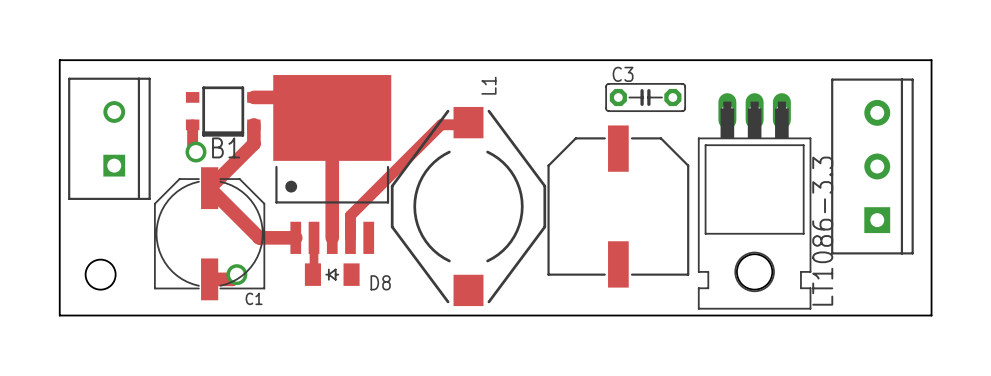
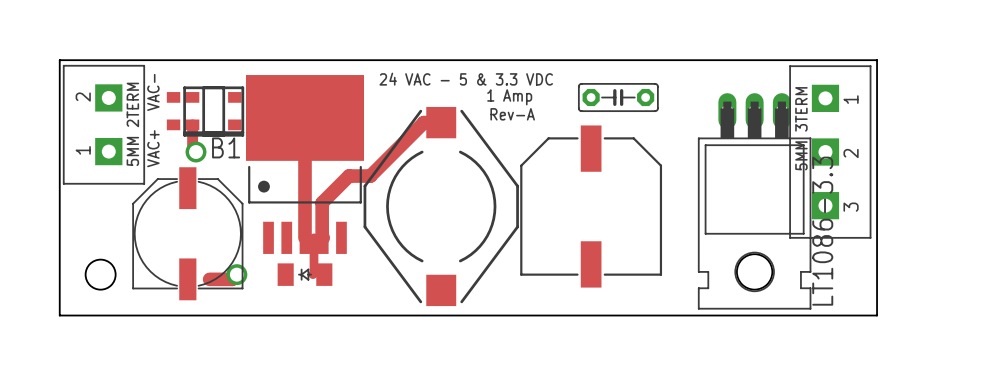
board edge: (877, 60) (931, 60) (931, 315) (877, 315) -> (877, 60) (877, 315)
text: none -> 24 VAC - 5 & 3.3 VDC (466, 79)
text: none -> VAC- (153, 92)
text: none -> 1 Amp (509, 97)
part: none -> (618, 97)
C3: (645, 97) -> none
part: none -> (204, 111)
text: none -> Rev-A (512, 114)
track: (332, 117) (332, 237) -> (305, 117) (305, 237)
track: none -> (441, 122) (423, 122) (370, 176) (348, 176) (322, 202) (323, 237)
part: none -> (103, 124)
track: (253, 124) (253, 143) (209, 188) (259, 237) (295, 237) -> none
track: (468, 124) (441, 124) (350, 215) (350, 237) -> none
part: (109, 138) -> none
text: none -> VAC+ (153, 148)
part: none -> (830, 152)
part position: (332, 164) -> (305, 164)
part: (872, 166) -> none
part: none -> (441, 206)
L1: (468, 206) -> none
part position: (618, 206) -> (591, 206)
part: none -> (187, 233)
C1: (209, 233) -> none
part: none -> (305, 274)
D8: (332, 274) -> none

